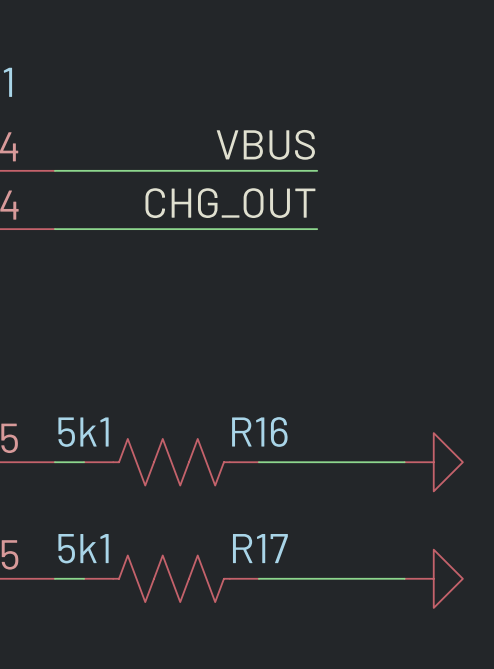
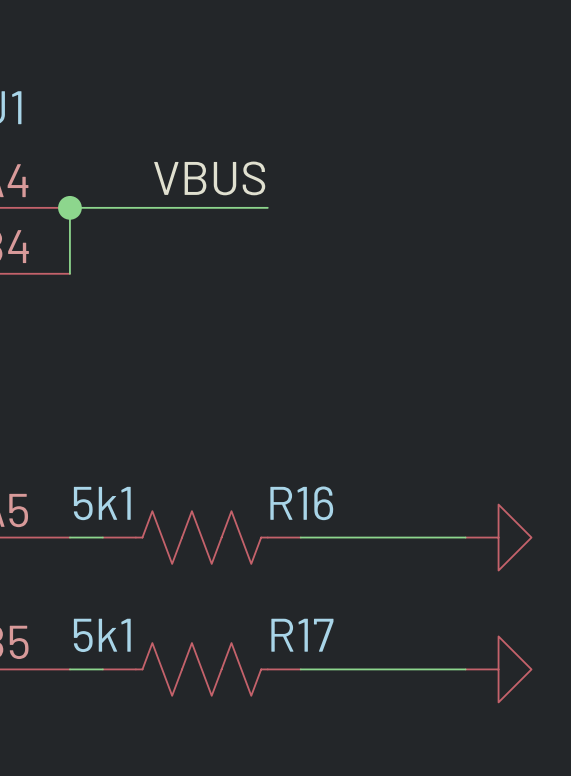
label position: VBUS (265, 144) -> VBUS (209, 178)
junction: none -> (69, 207)
wire: (229, 170) (317, 170) -> none
label: CHG_OUT (230, 203) -> none
wire: (54, 229) (317, 229) -> (69, 273) (69, 207)

